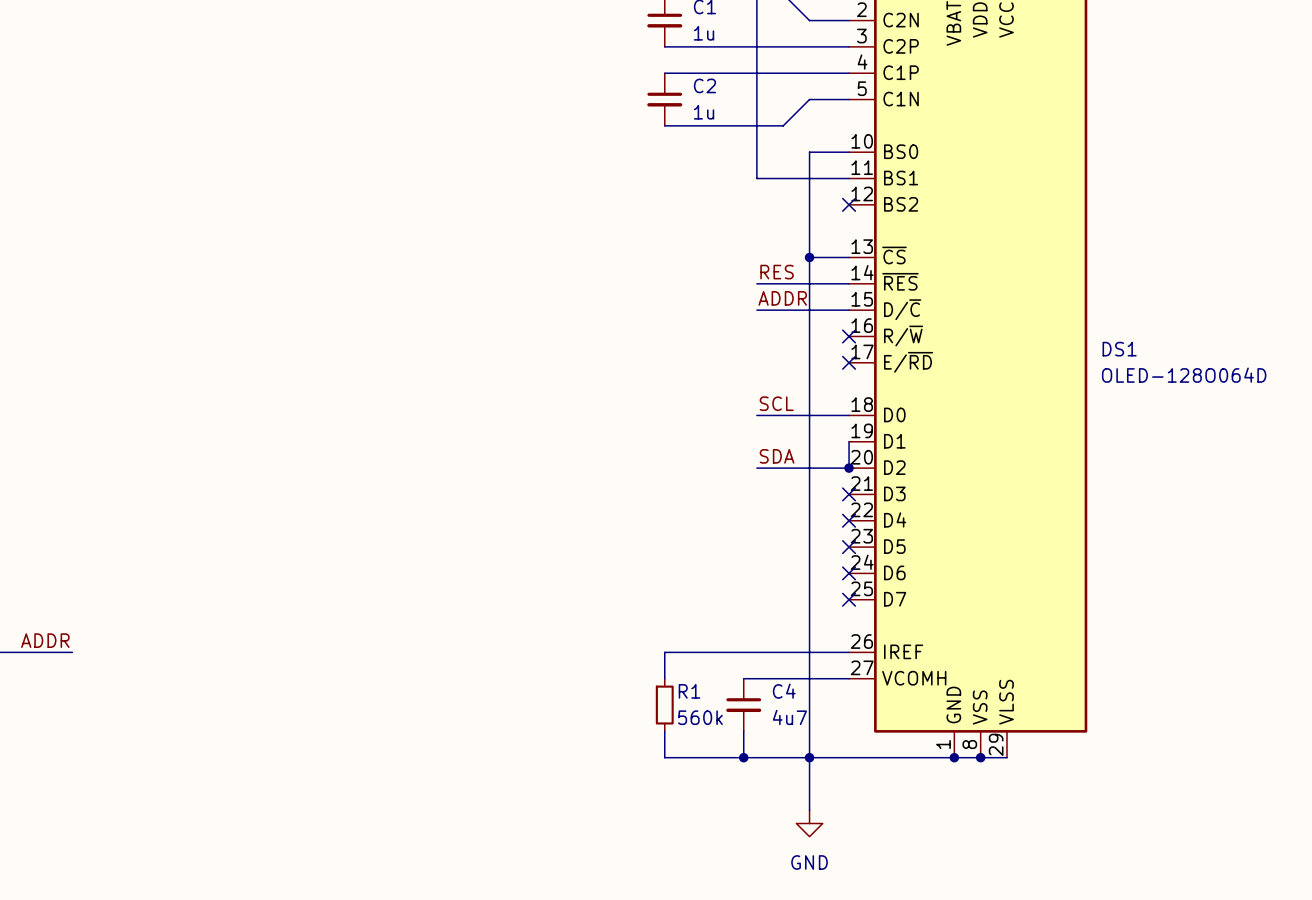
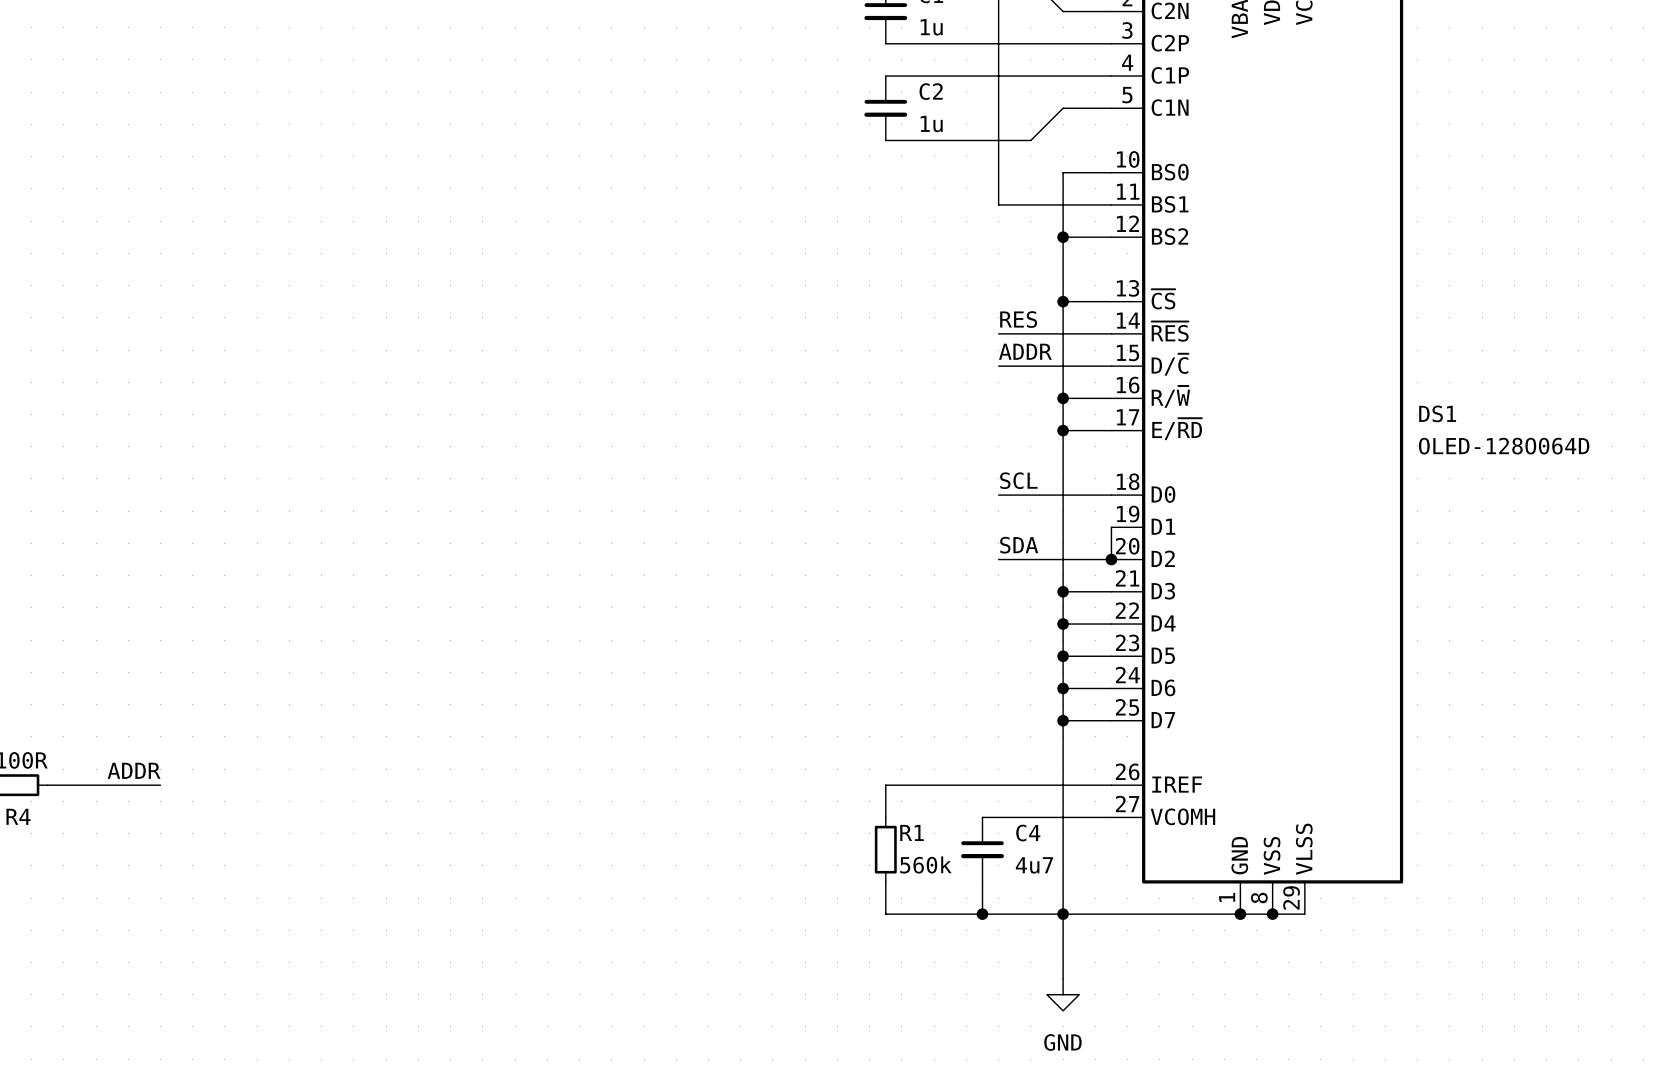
wire: none -> (1063, 237) (1111, 237)
junction: none -> (1063, 237)
no-connect mark: (849, 204) -> none
wire: none -> (1063, 398) (1111, 398)
junction: none -> (1063, 398)
no-connect mark: (849, 336) -> none
wire: none -> (1063, 430) (1111, 430)
junction: none -> (1063, 430)
no-connect mark: (849, 362) -> none
wire: none -> (1063, 591) (1111, 591)
junction: none -> (1063, 591)
no-connect mark: (849, 494) -> none
wire: none -> (1063, 624) (1111, 624)
junction: none -> (1063, 624)
no-connect mark: (849, 520) -> none
wire: none -> (1063, 656) (1111, 656)
junction: none -> (1063, 656)
no-connect mark: (849, 547) -> none
wire: none -> (1063, 688) (1111, 688)
junction: none -> (1063, 688)
no-connect mark: (849, 573) -> none
wire: none -> (1063, 720) (1111, 720)
junction: none -> (1063, 720)
no-connect mark: (849, 599) -> none

